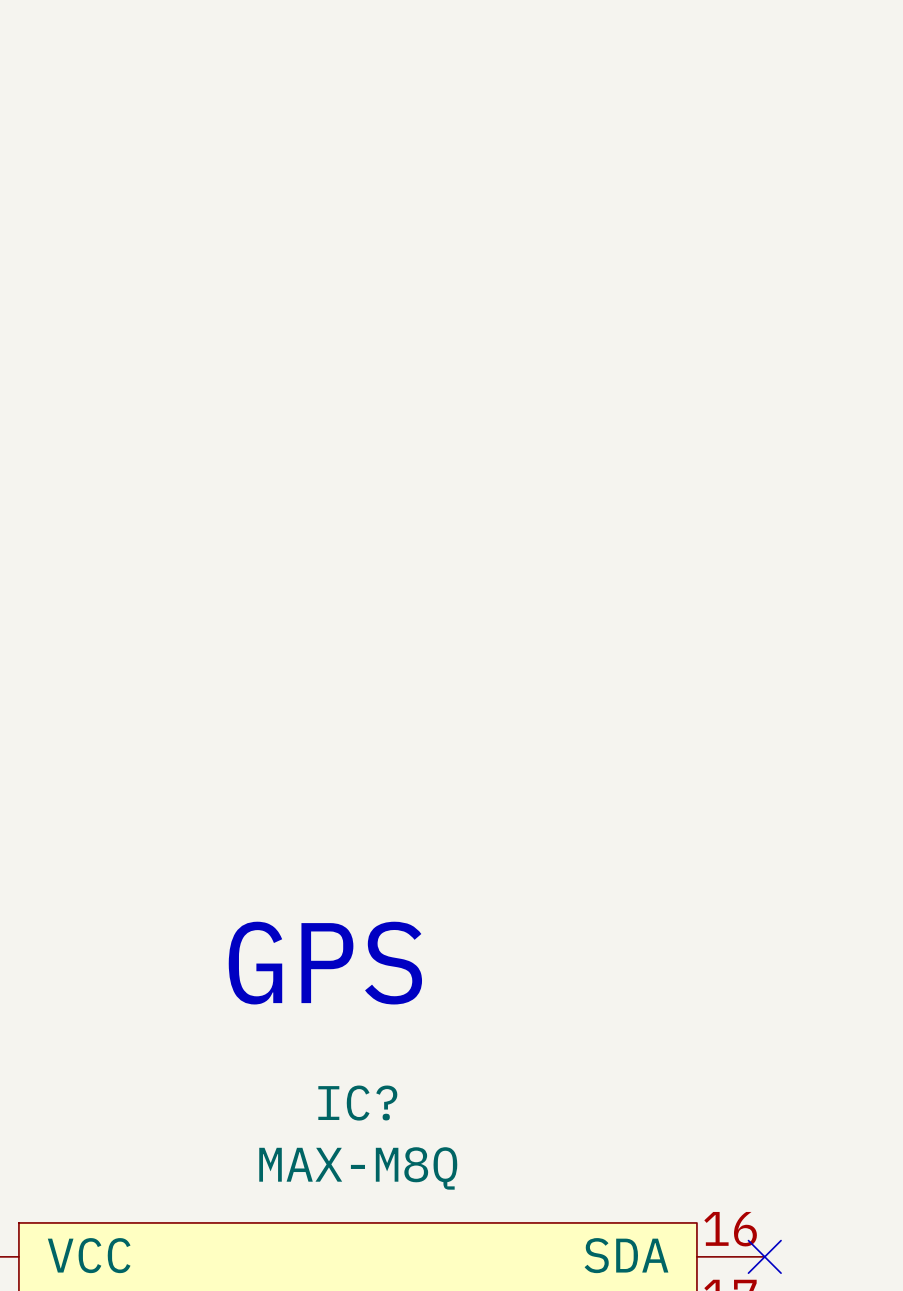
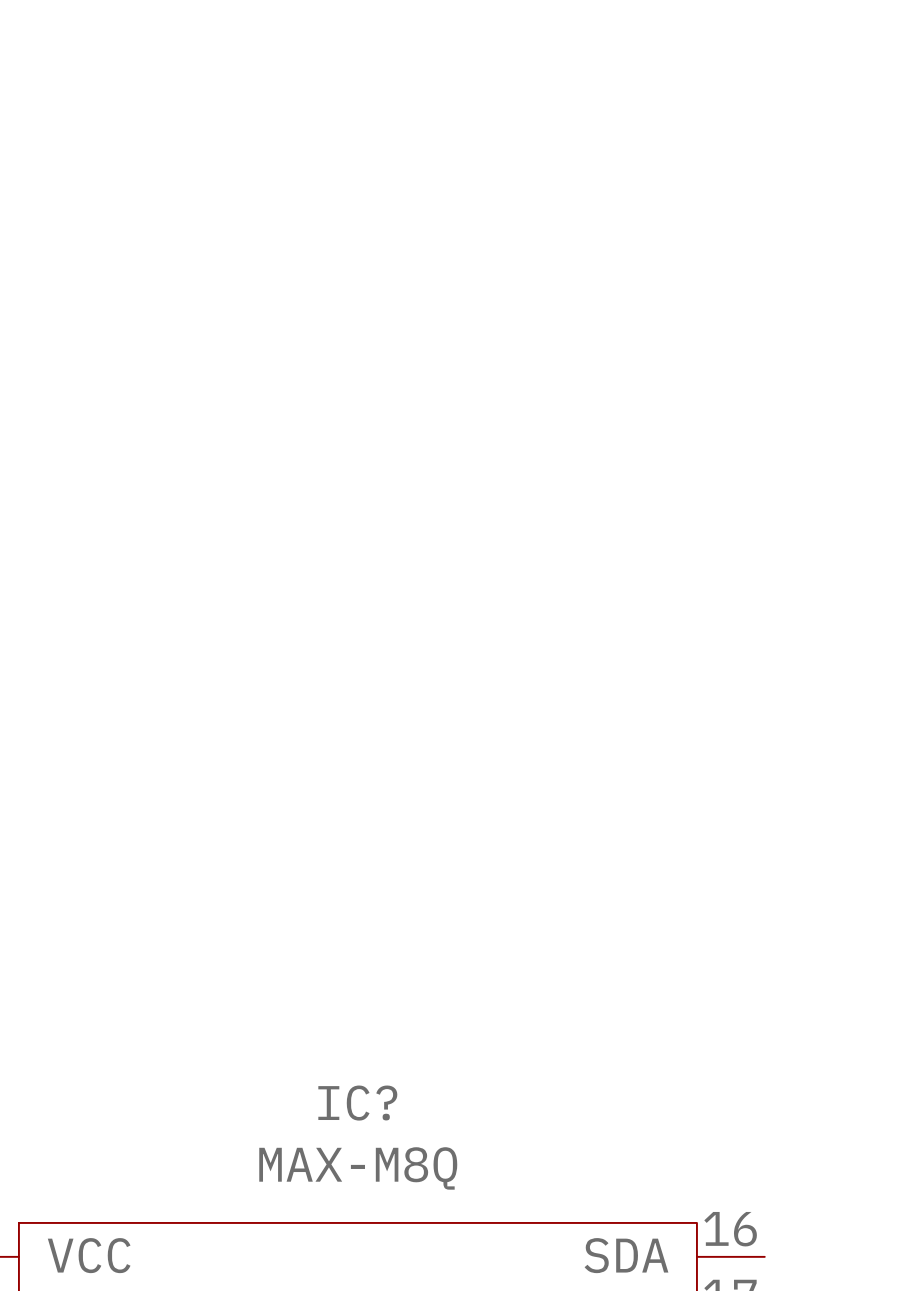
text: GPS (325, 963) -> none
no-connect mark: (764, 1256) -> none

